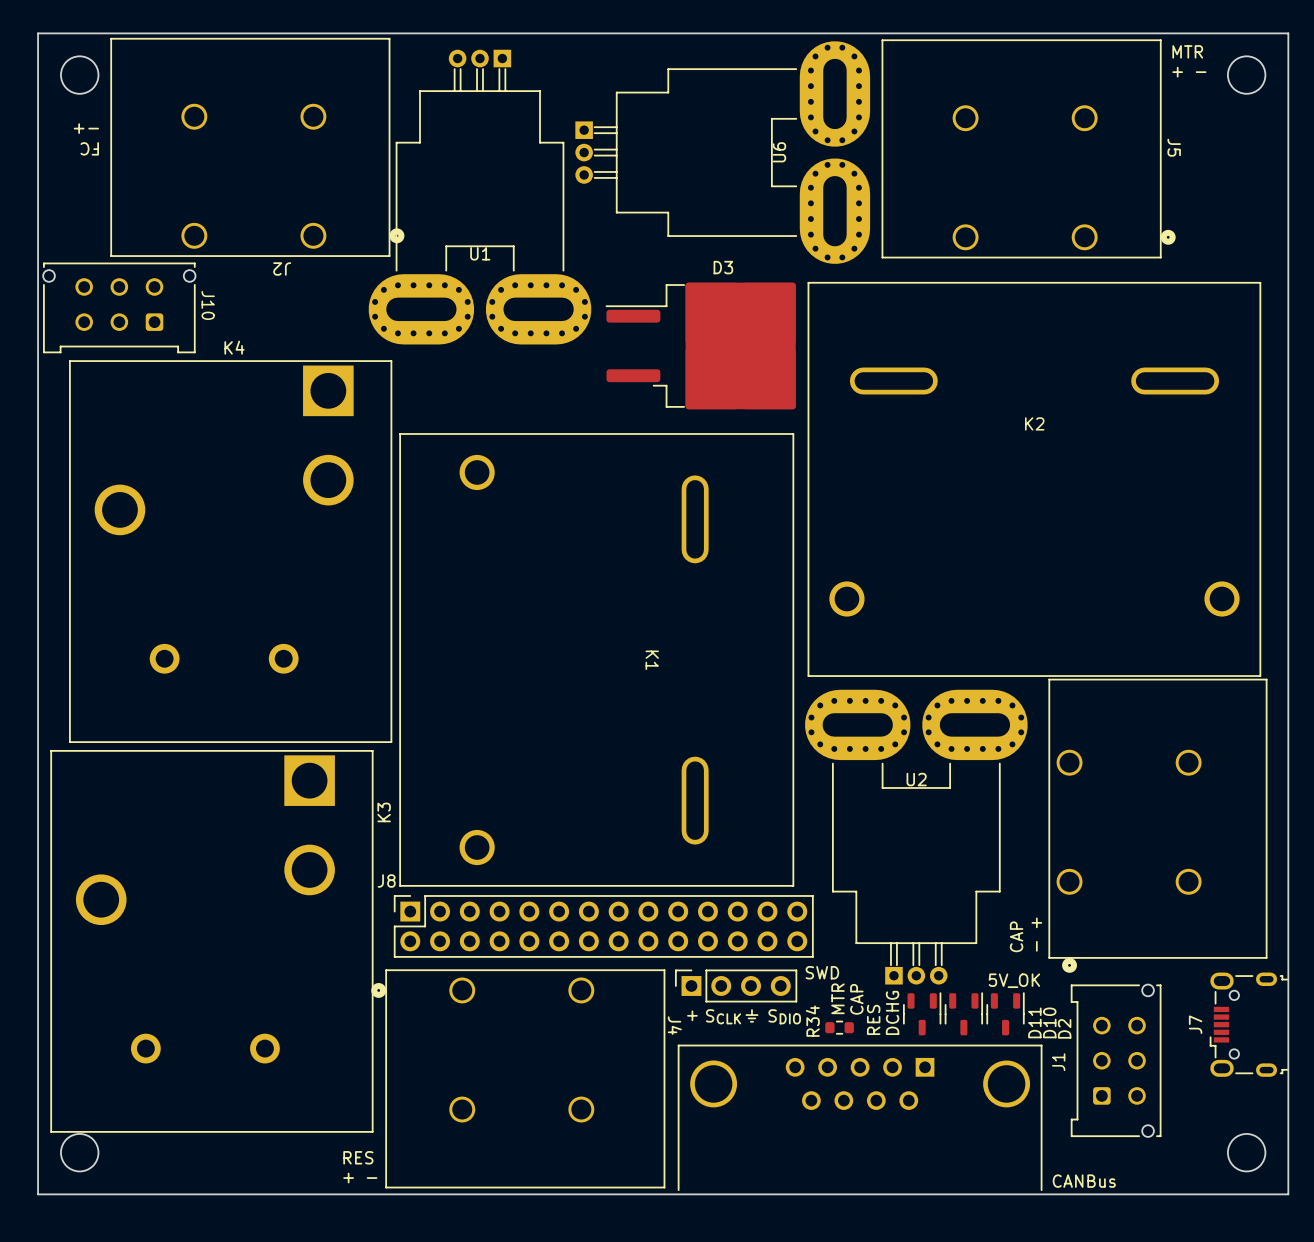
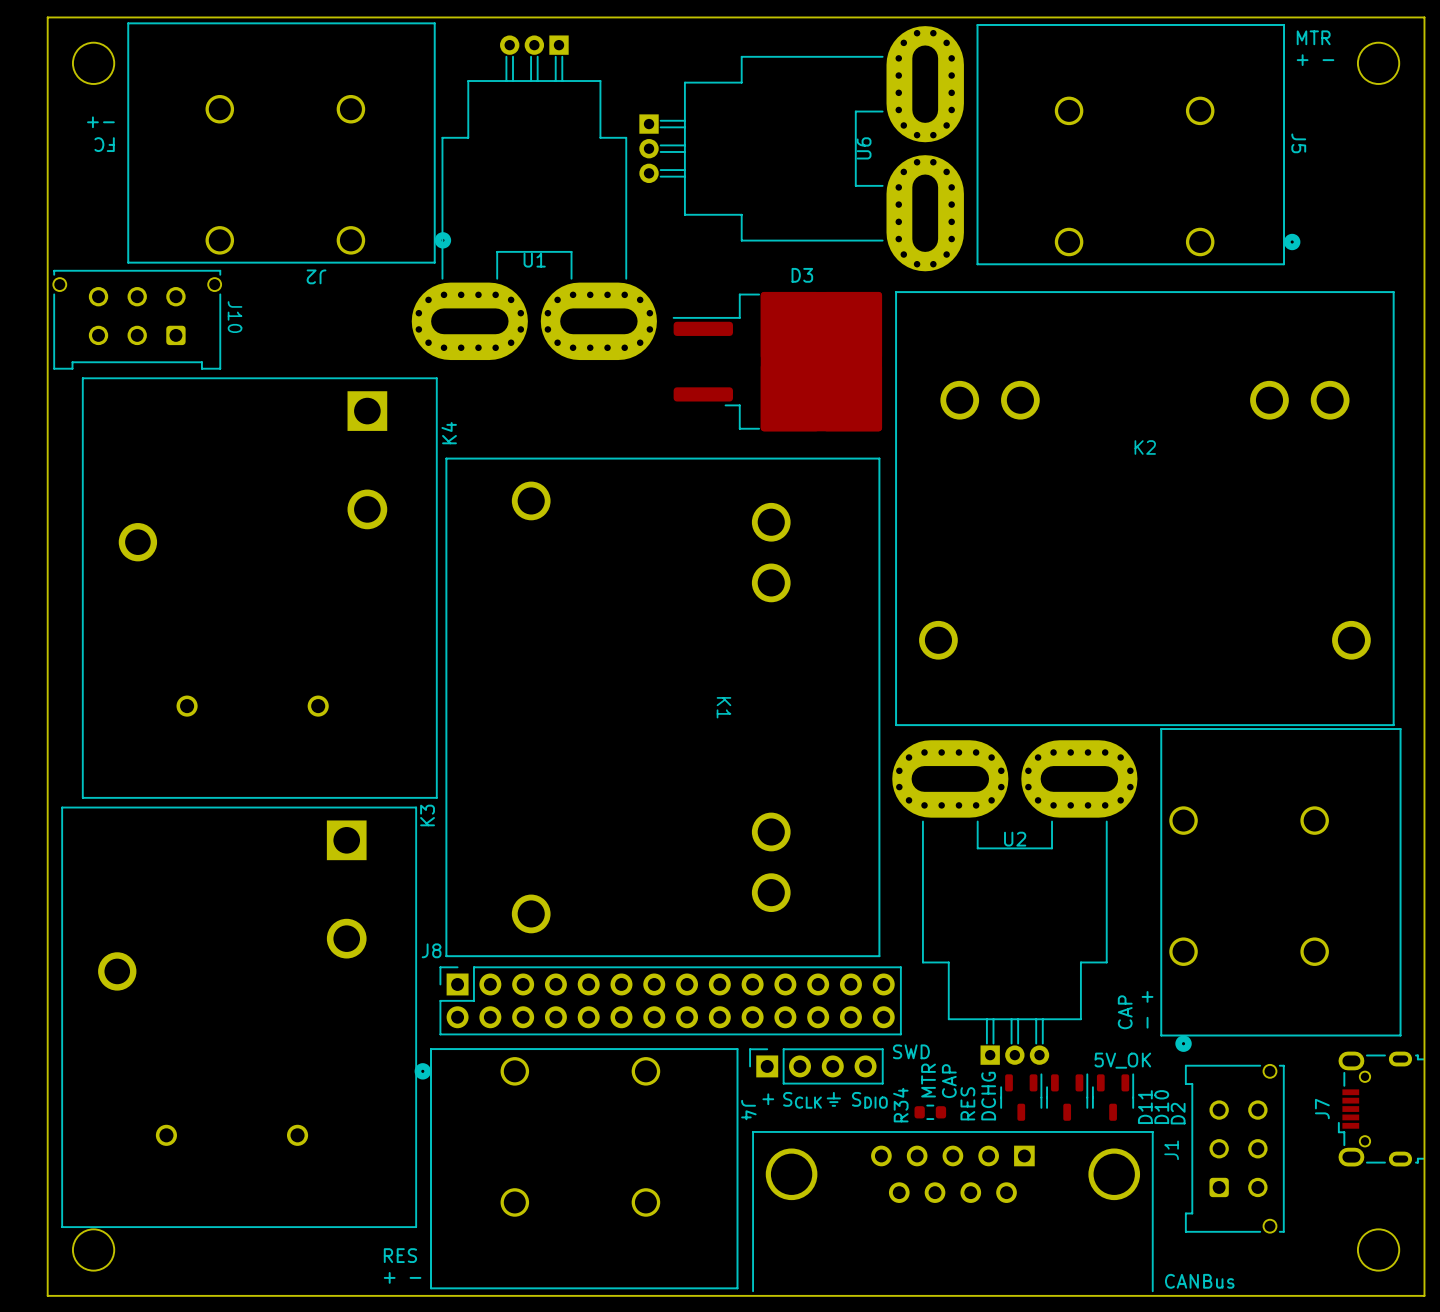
K2 footprint: [807, 281, 1262, 677] -> [895, 291, 1395, 727]
K4 name rotation: 0° (234, 347) -> 90° counterclockwise (449, 433)
K4 name position: K4 (234, 347) -> K4 (449, 433)
K4 footprint: [69, 360, 393, 743] -> [81, 377, 438, 799]
K1 footprint: [399, 433, 795, 887] -> [445, 457, 881, 958]
K3 footprint: [50, 750, 374, 1133] -> [61, 806, 417, 1228]
K3 name position: K3 (384, 812) -> K3 (427, 815)

